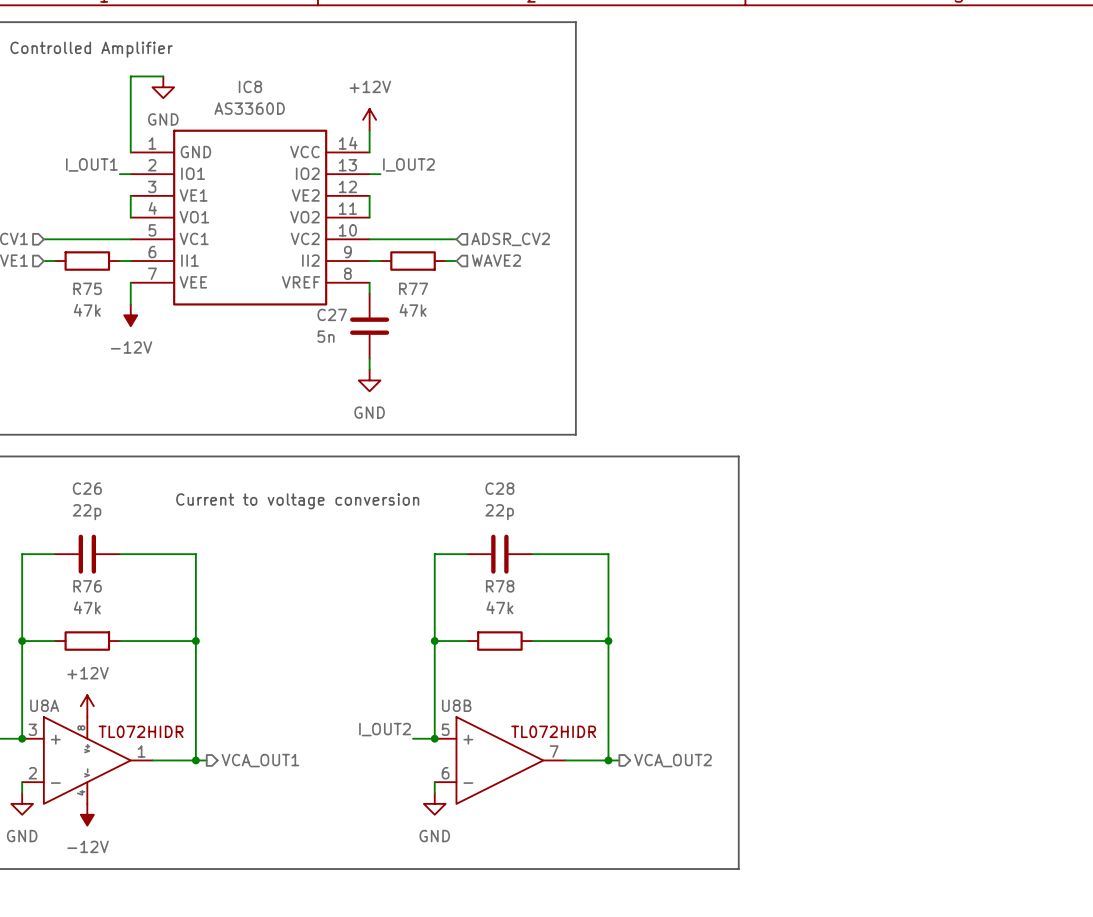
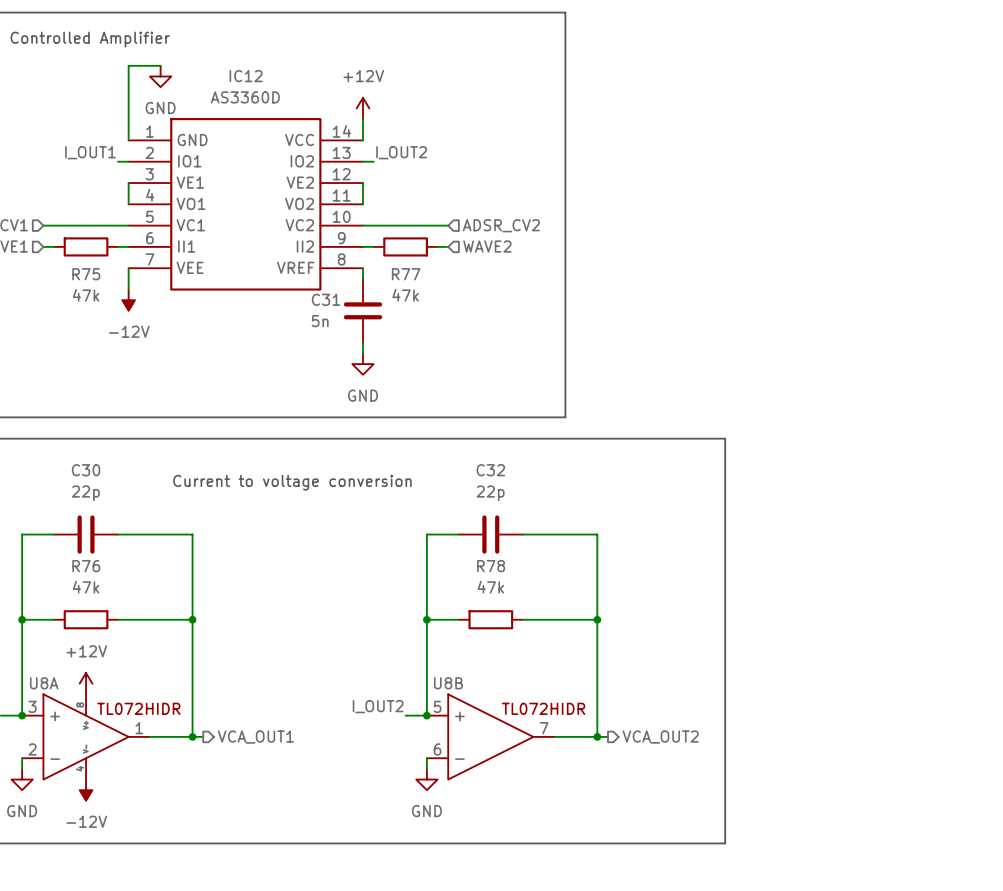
IC8 name: IC8 (250, 86) -> IC12 (246, 76)
C27 name: C27 (332, 314) -> C31 (326, 299)
C26 name: C26 (87, 488) -> C30 (86, 470)
C28 name: C28 (499, 488) -> C32 (490, 470)

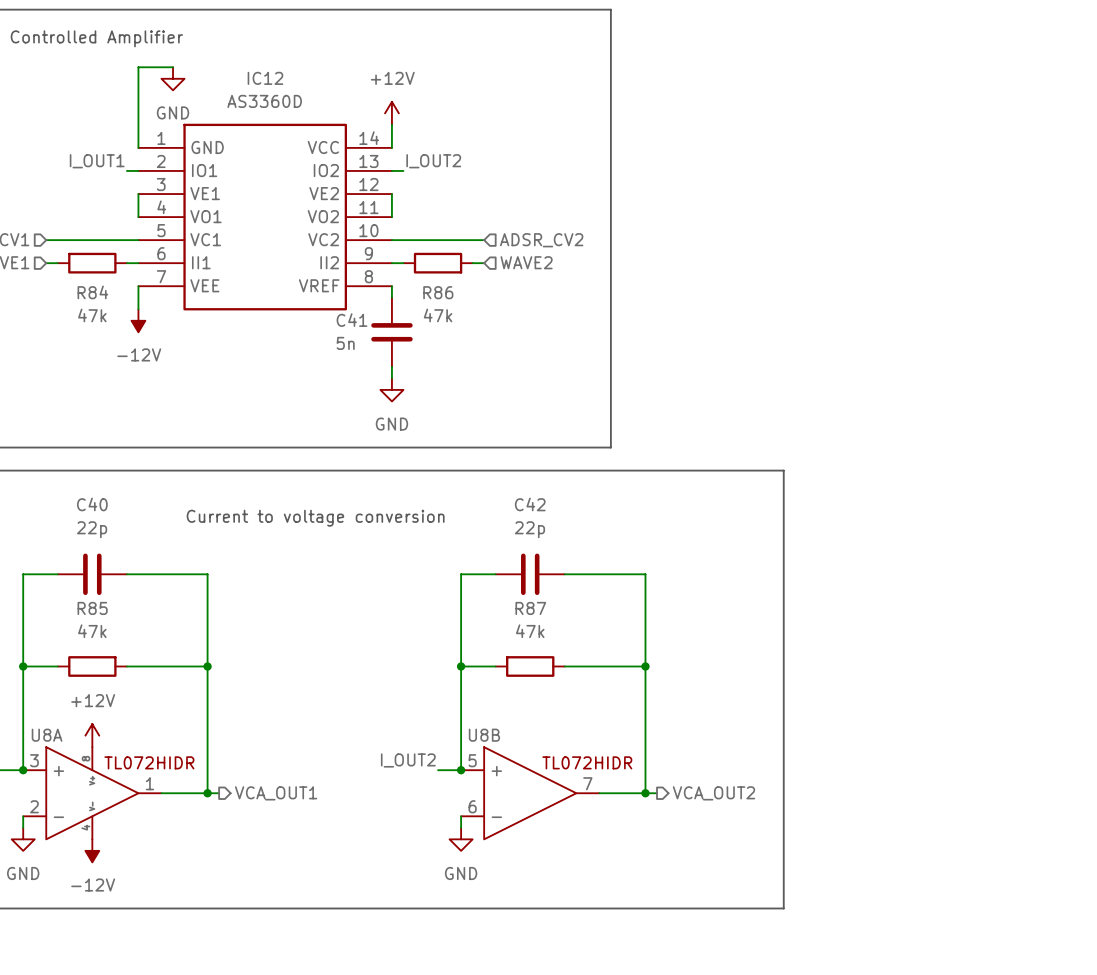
R75 name: R75 (86, 274) -> R84 (92, 292)
R77 name: R77 (406, 274) -> R86 (438, 292)
C31 name: C31 (326, 299) -> C41 (351, 320)
C30 name: C30 (86, 470) -> C40 (92, 504)
C32 name: C32 (490, 470) -> C42 (530, 504)
R76 name: R76 (86, 566) -> R85 (92, 608)
R78 name: R78 (491, 566) -> R87 (530, 608)

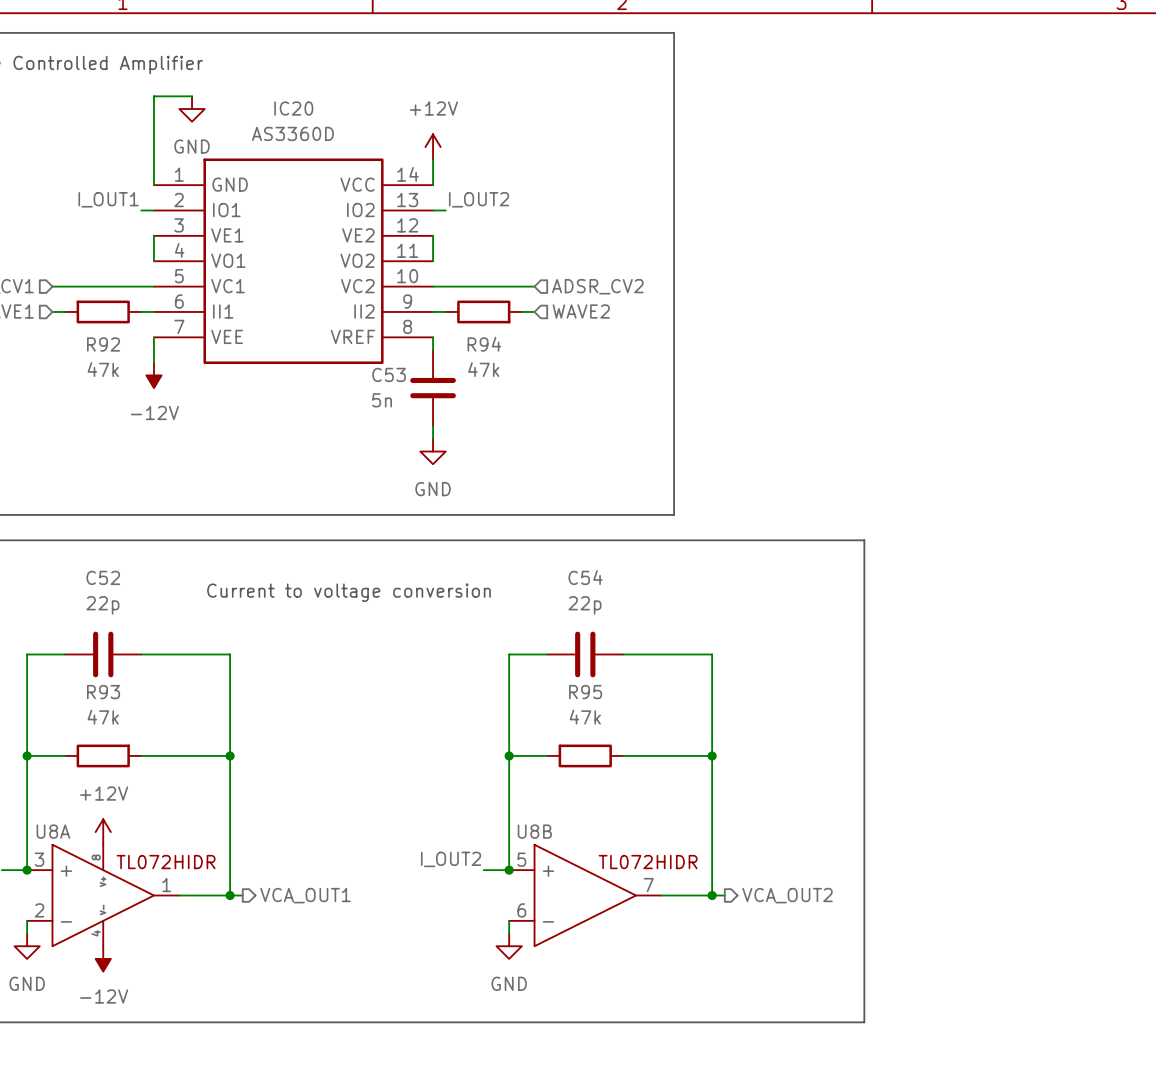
IC12 name: IC12 (265, 78) -> IC20 (293, 108)
R84 name: R84 (92, 292) -> R92 (103, 344)
R86 name: R86 (438, 292) -> R94 (484, 344)
C41 name: C41 (351, 320) -> C53 (389, 374)
C40 name: C40 (92, 504) -> C52 (103, 577)
C42 name: C42 (530, 504) -> C54 (585, 577)
R85 name: R85 (92, 608) -> R93 (103, 692)
R87 name: R87 (530, 608) -> R95 (585, 692)

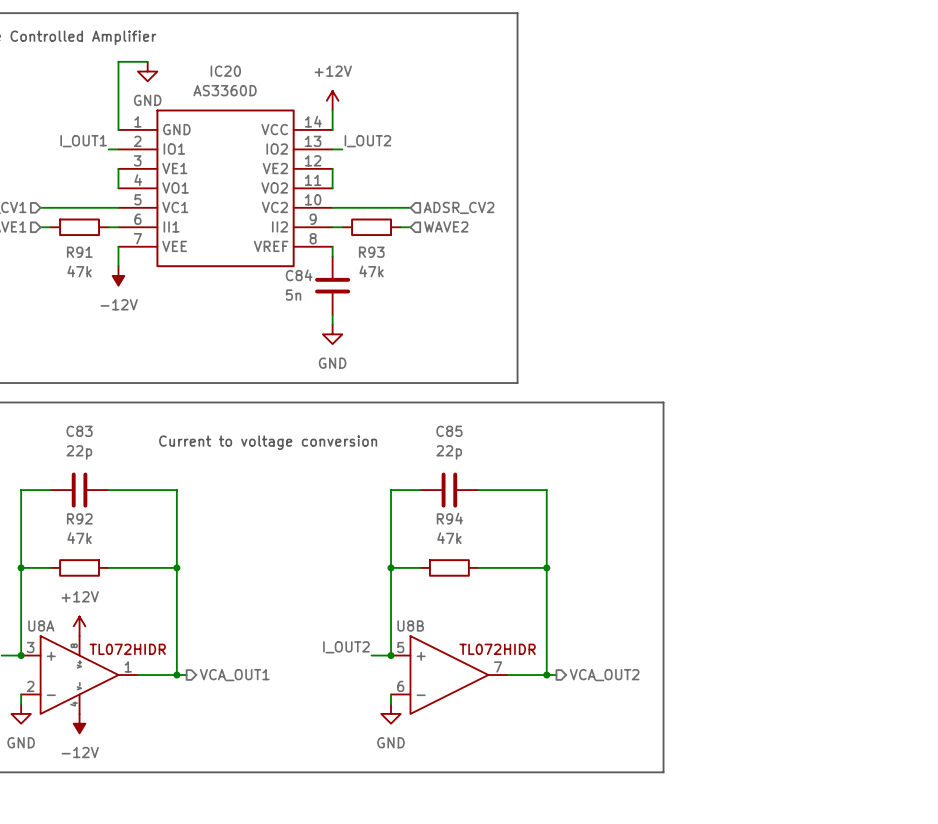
R92 name: R92 (103, 344) -> R91 (79, 252)
R94 name: R94 (484, 344) -> R93 (371, 252)
C53 name: C53 (389, 374) -> C84 (299, 275)
C52 name: C52 (103, 577) -> C83 (79, 431)
C54 name: C54 (585, 577) -> C85 (449, 431)
R93 name: R93 (103, 692) -> R92 (79, 518)
R95 name: R95 (585, 692) -> R94 (449, 518)

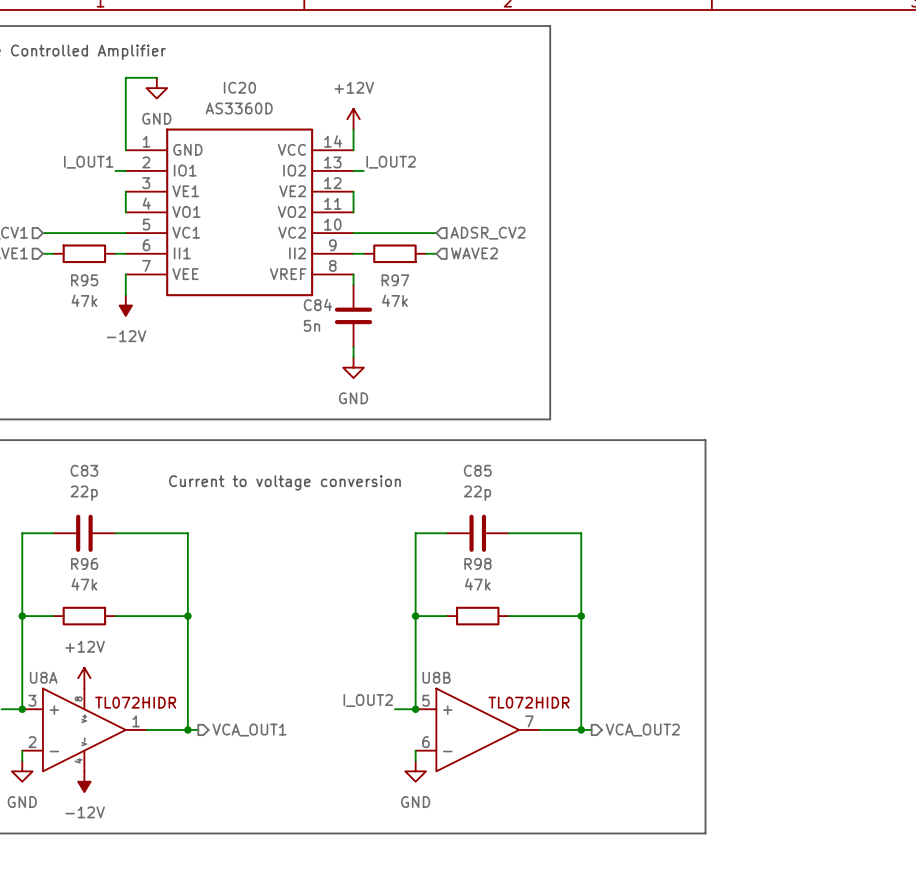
R91 name: R91 (79, 252) -> R95 (84, 280)
R93 name: R93 (371, 252) -> R97 (395, 280)
R92 name: R92 (79, 518) -> R96 (84, 563)
R94 name: R94 (449, 518) -> R98 (478, 563)

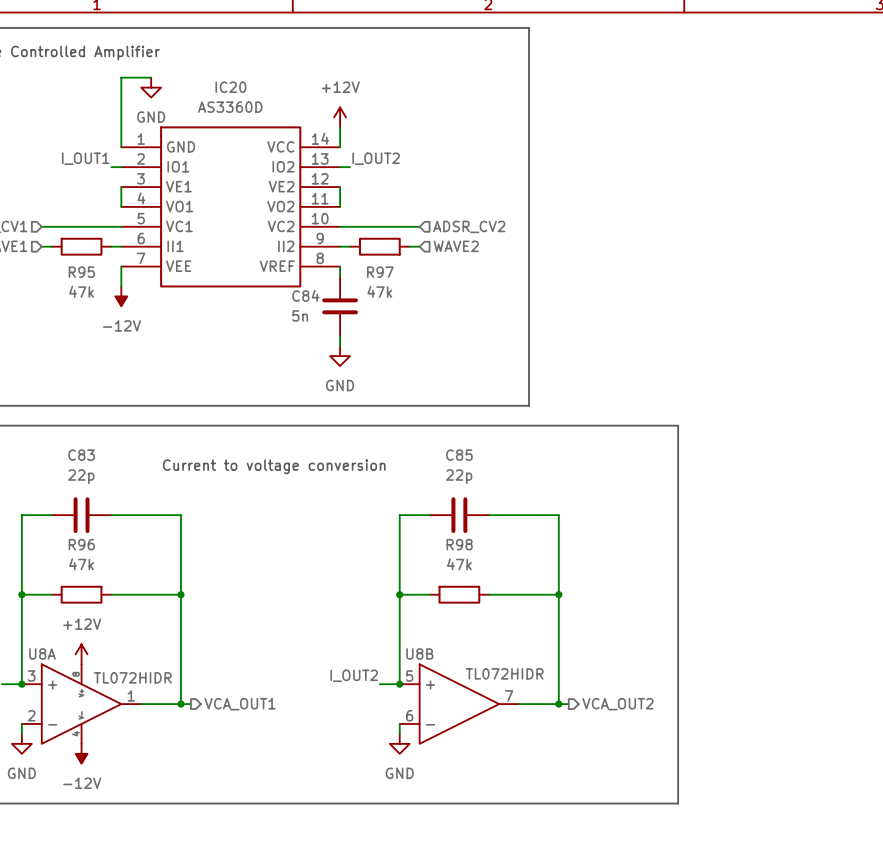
U8B value: none -> TL072HIDR (504, 673)
U8A text: TL072HIDR (135, 702) -> none
U8A value: none -> TL072HIDR (132, 677)
U8B text: TL072HIDR (529, 702) -> none

